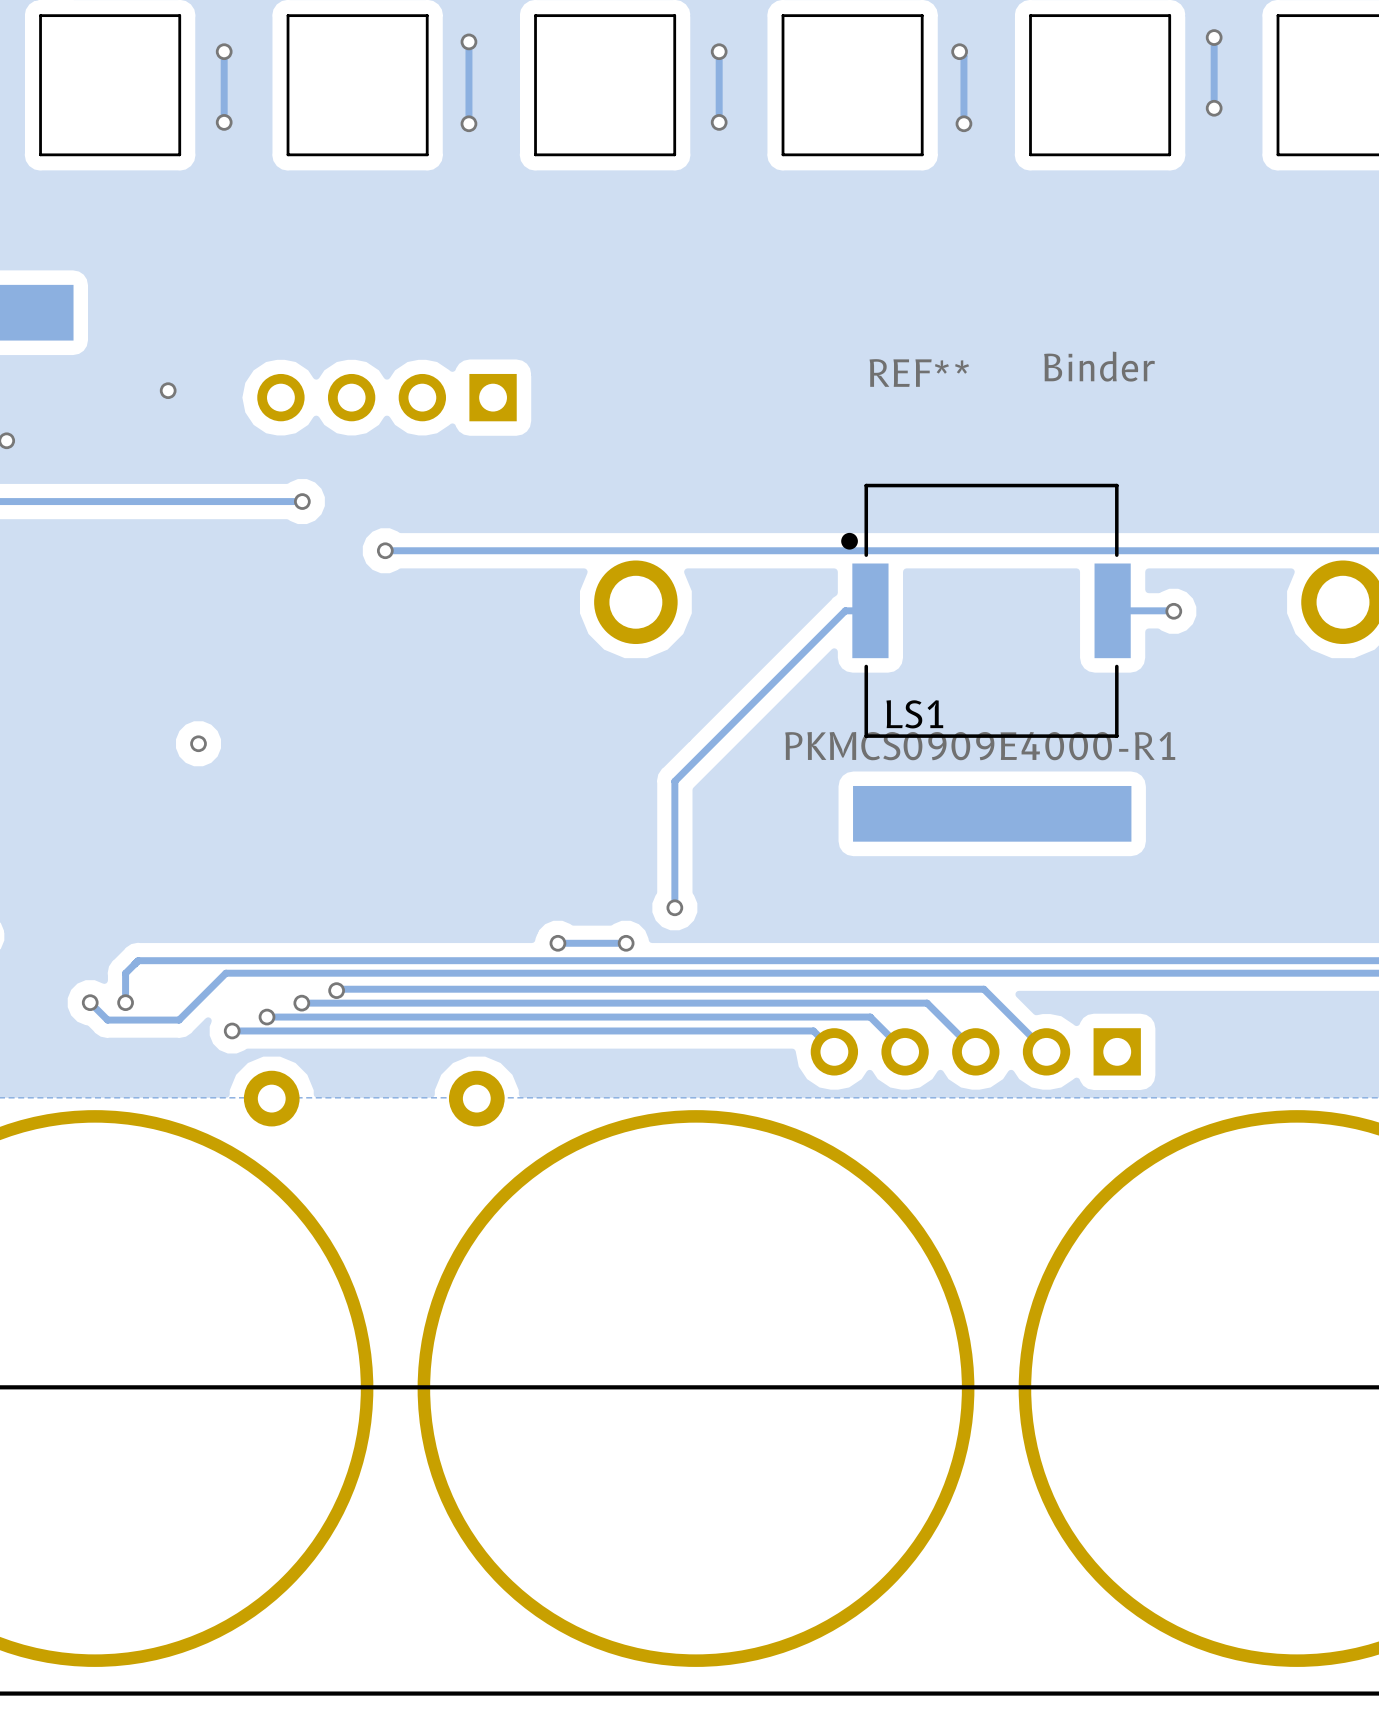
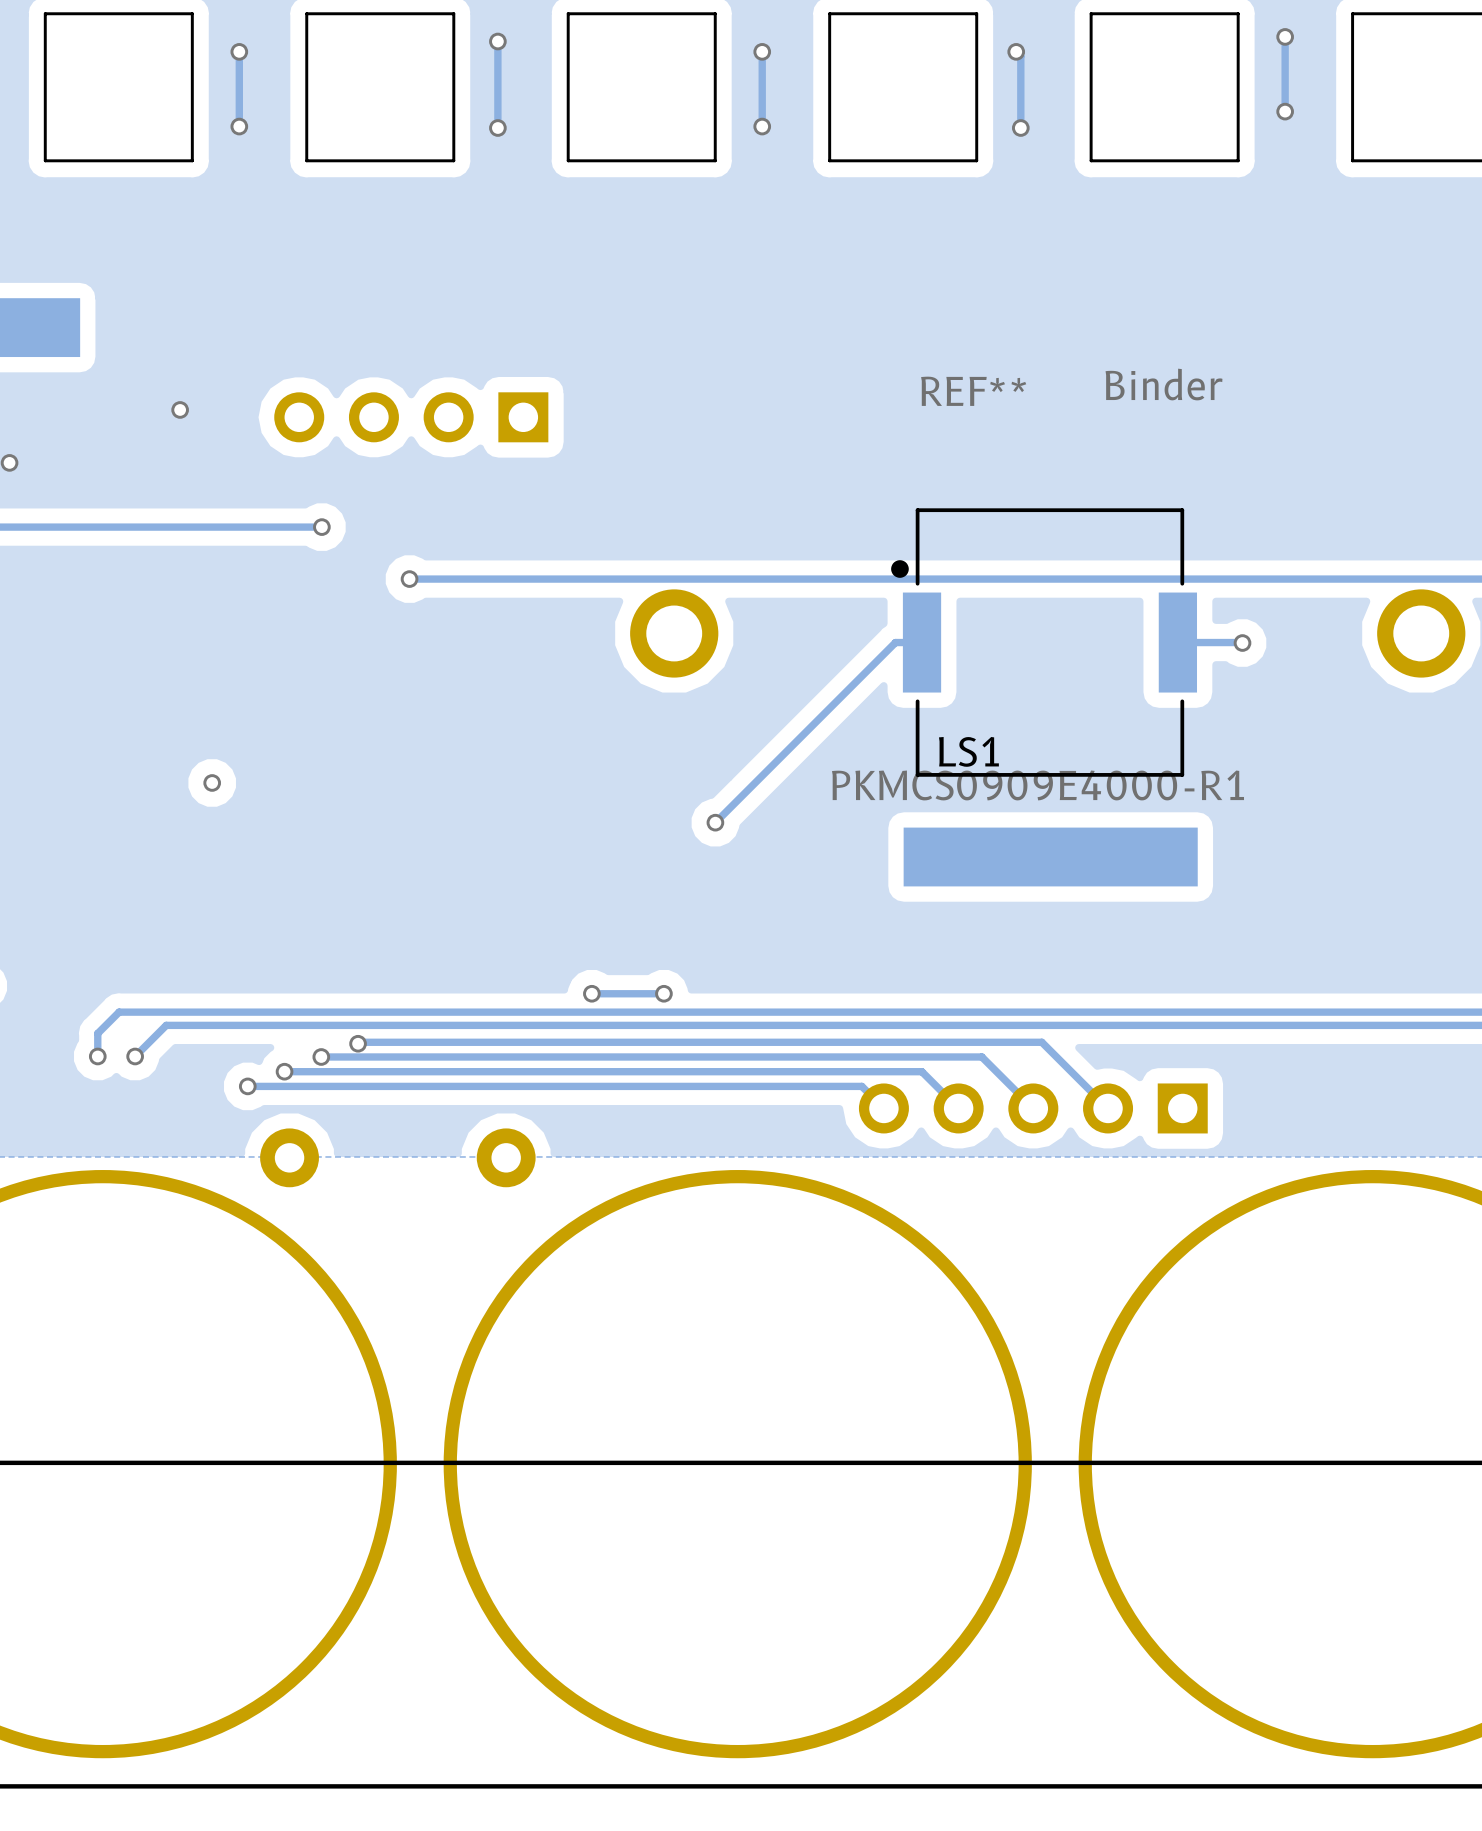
track: (674, 781) (674, 907) -> none
via position: (674, 907) -> (715, 822)
track: (138, 960) (125, 973) (125, 1002) -> (148, 1012) (119, 1012) (97, 1033) (97, 1056)
track: (225, 973) (179, 1020) (107, 1020) (90, 1002) -> (241, 1025) (166, 1025) (135, 1056)

